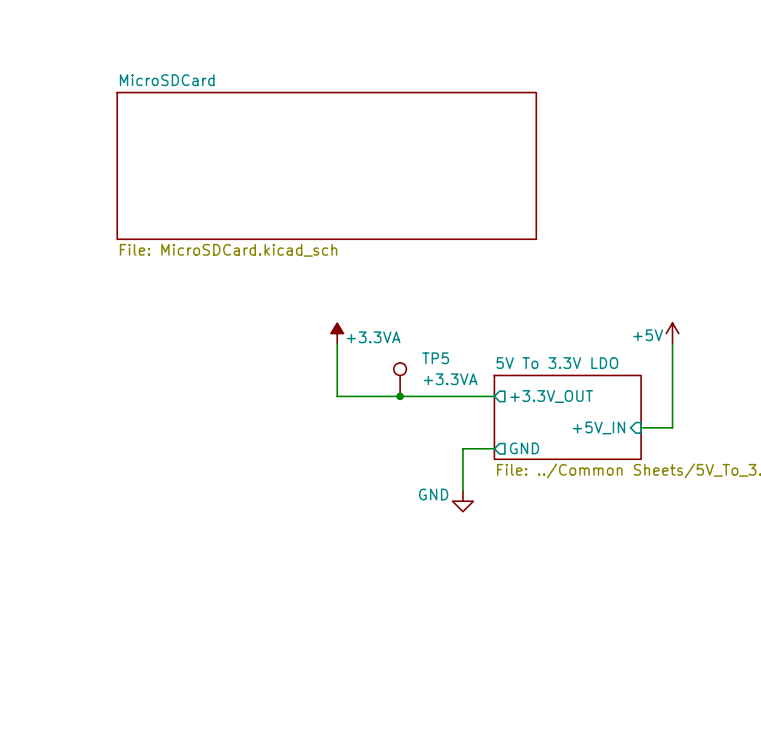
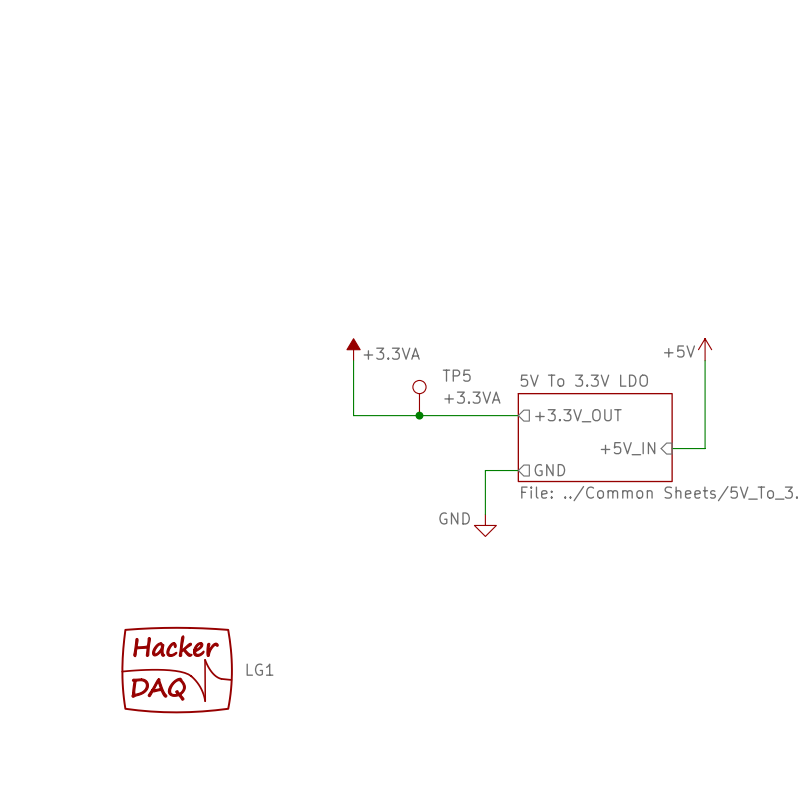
sheet MicroSDCard: File: MicroSDCard.kicad_sch (326, 165) -> none
LG1: none -> (177, 670)

